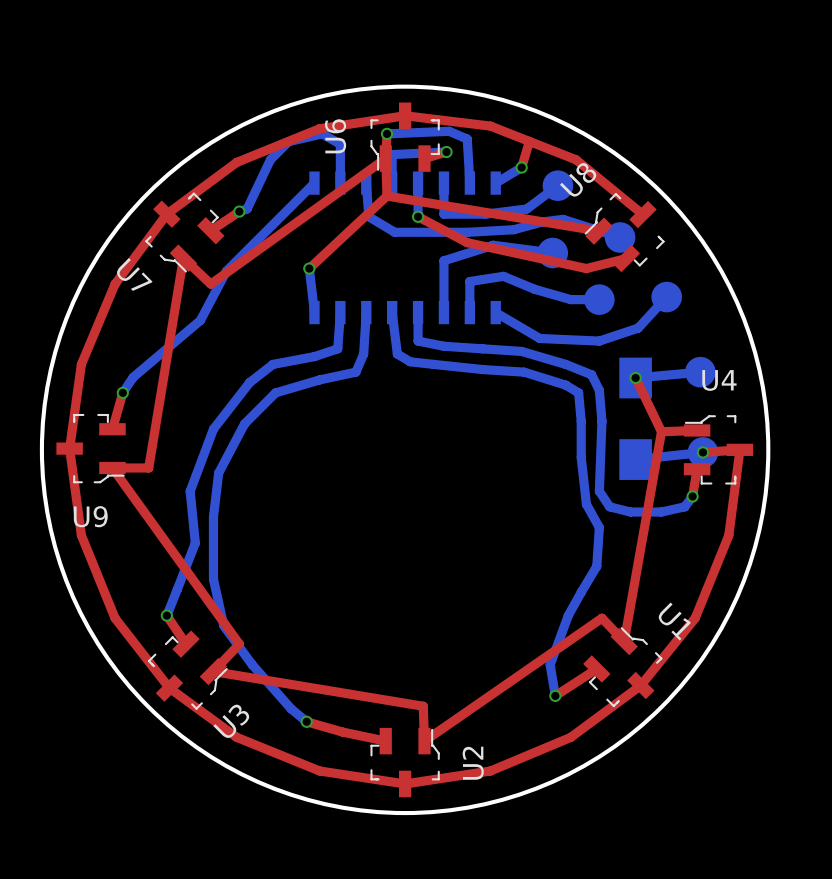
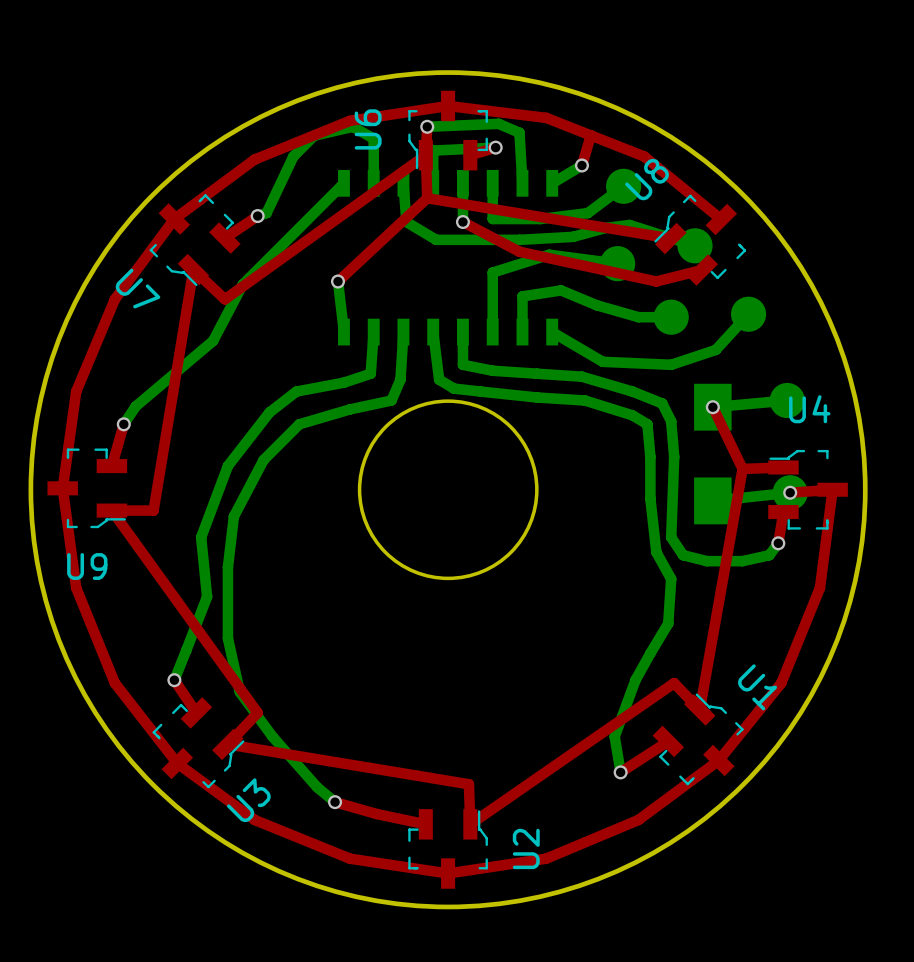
round board edge: none -> [357, 399, 539, 581]

